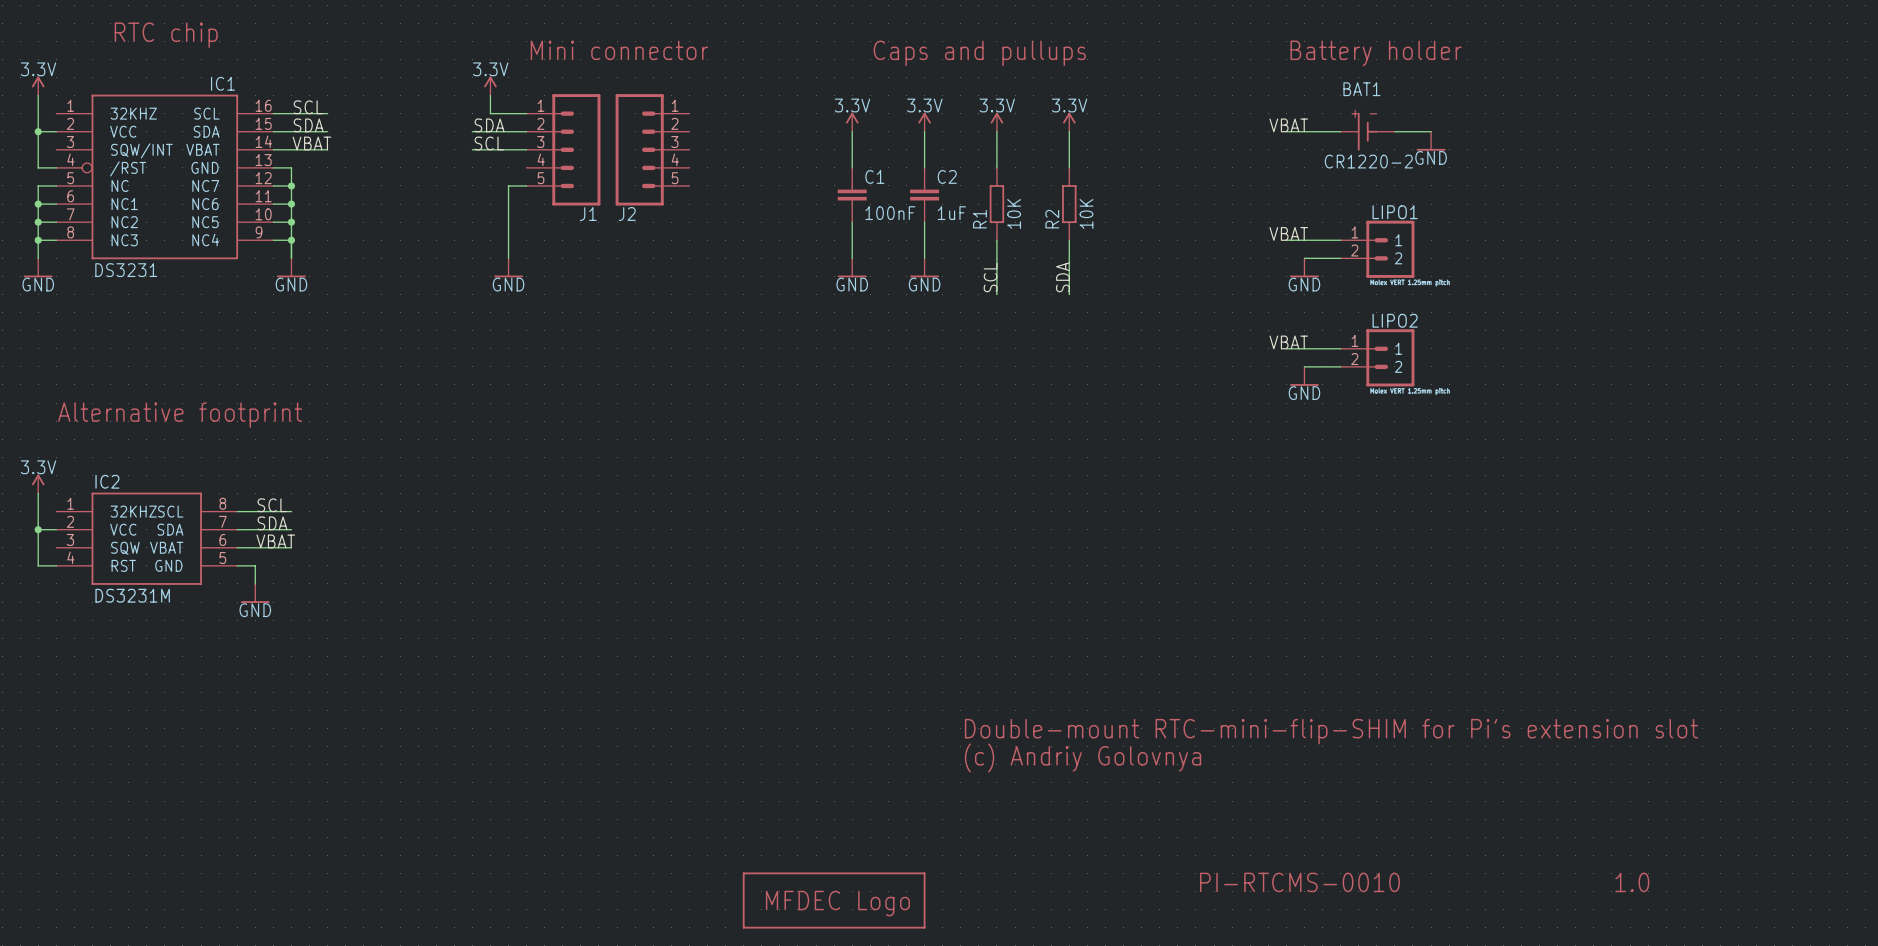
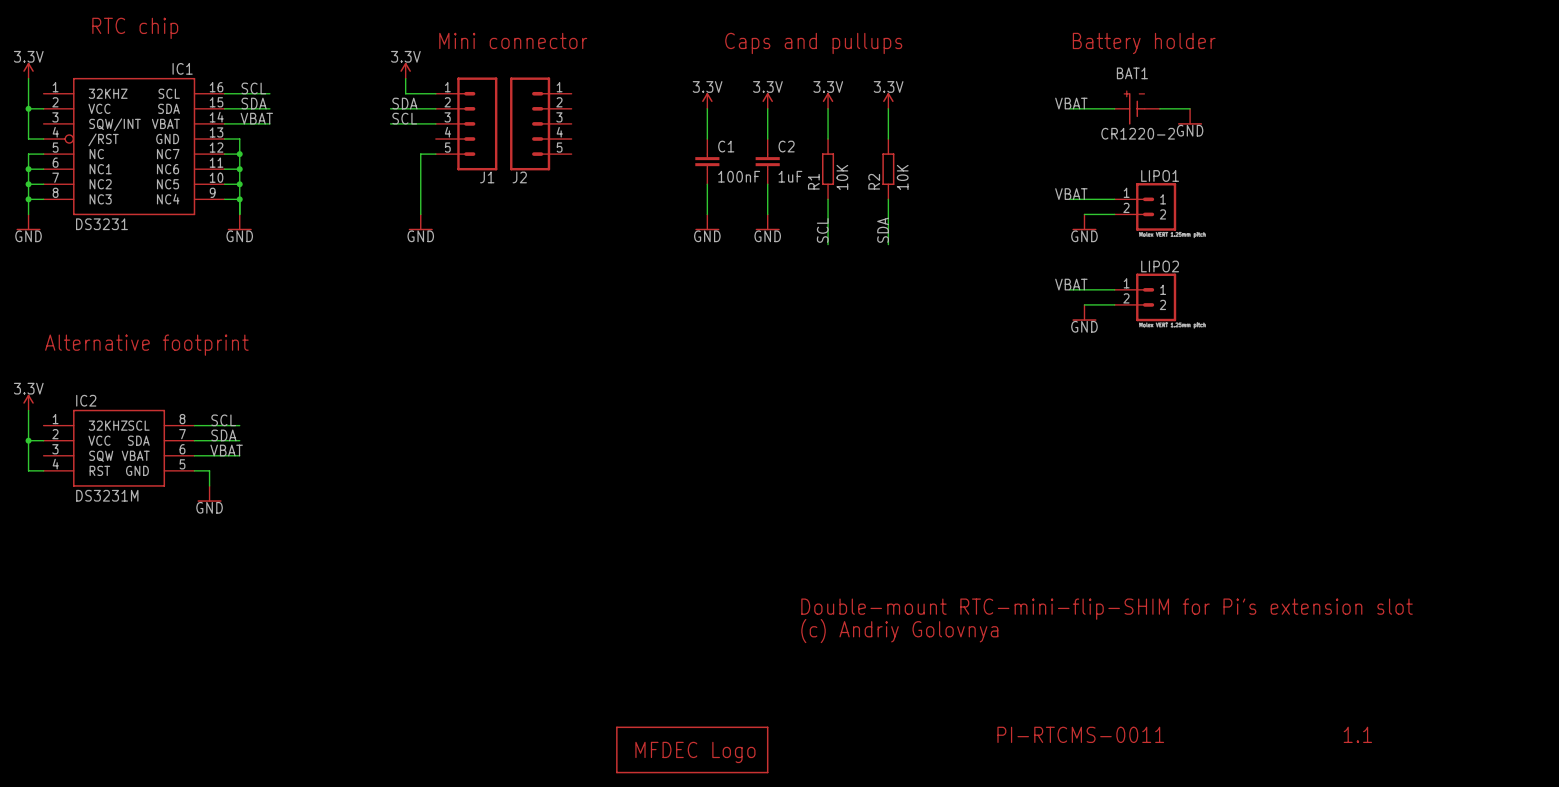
text: PI-RTCMS-0010 (1299, 882) -> PI-RTCMS-0011 (1080, 734)
text: 1.0 (1632, 882) -> 1.1 (1357, 734)

